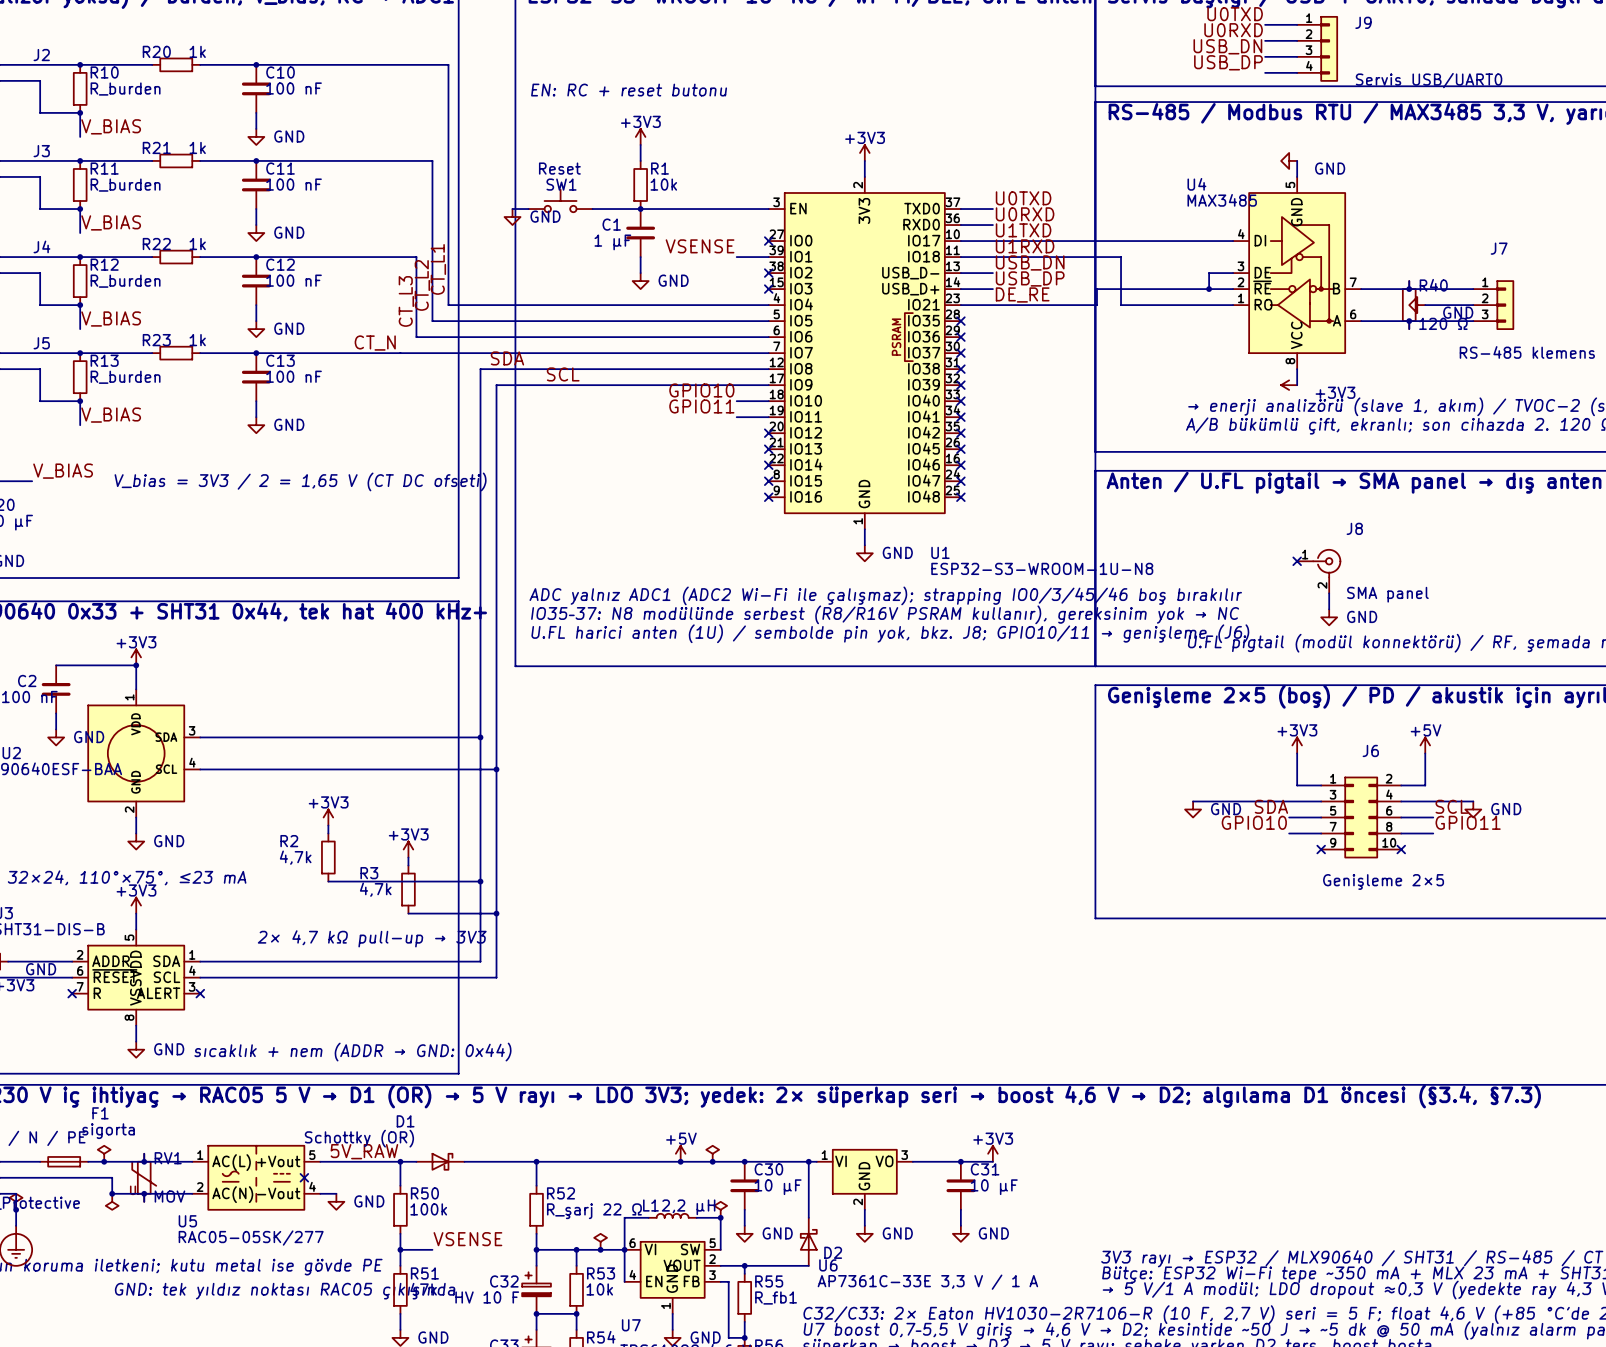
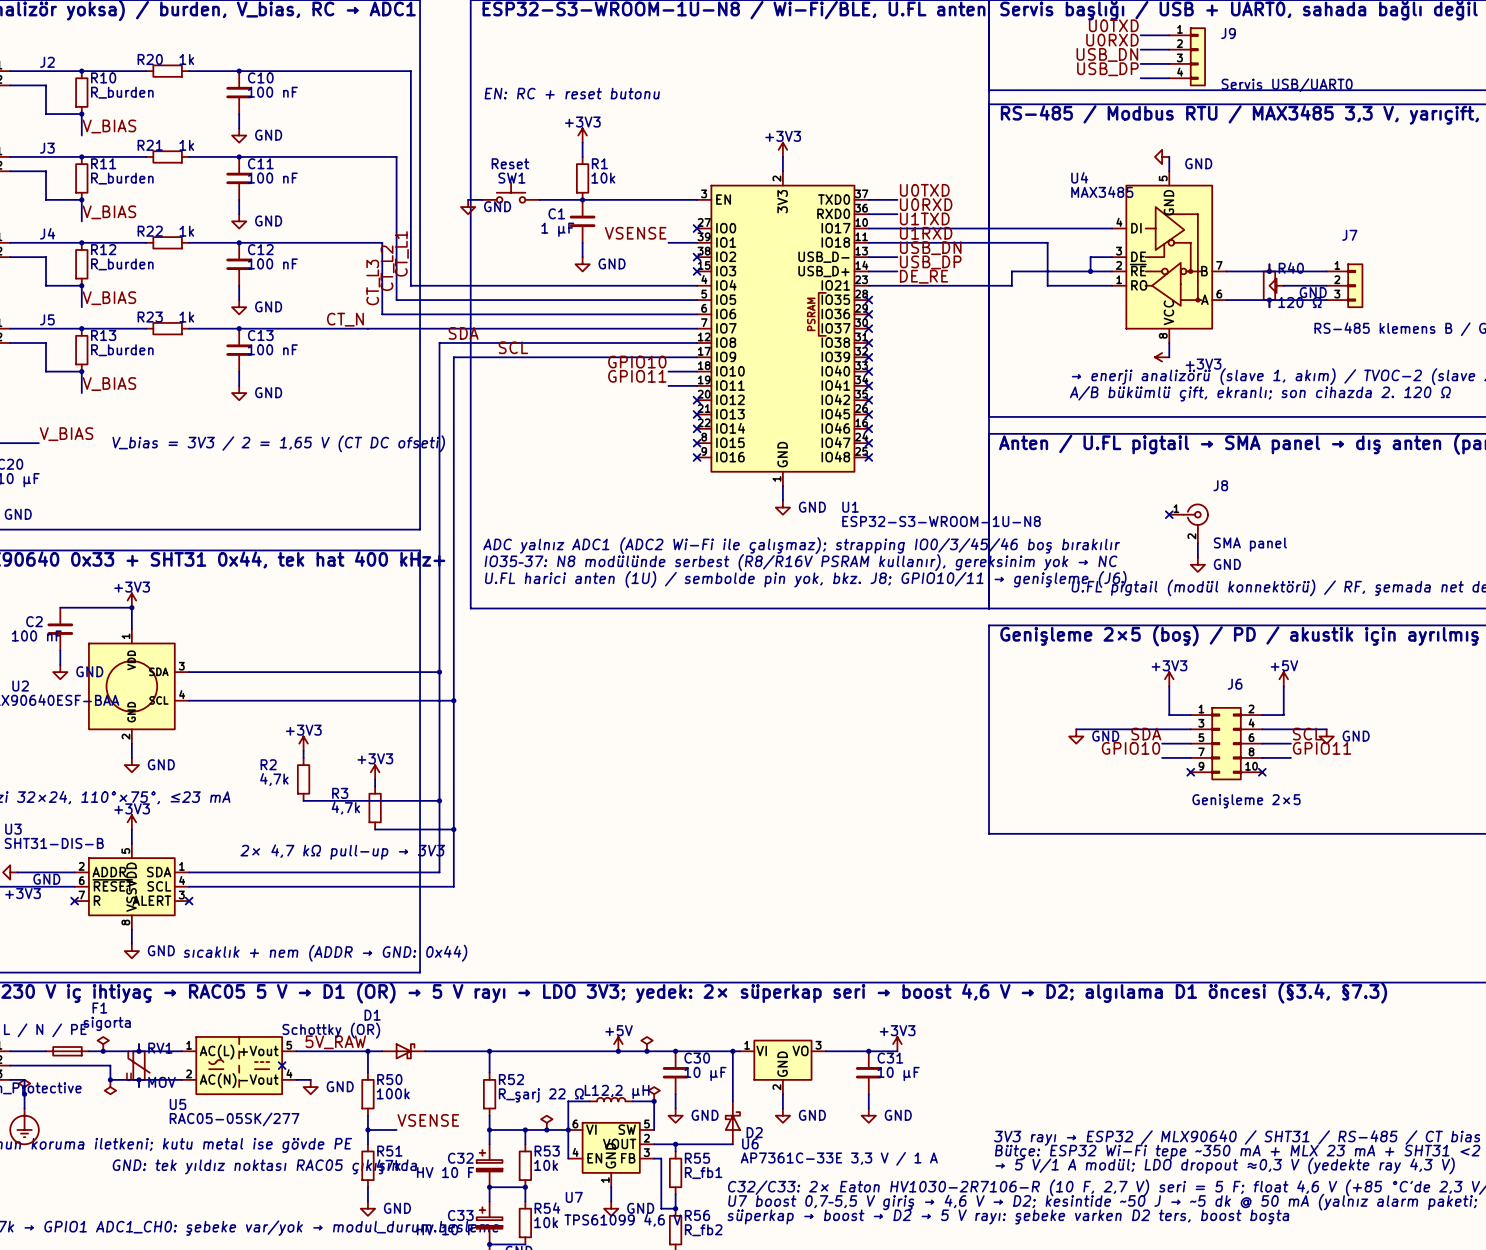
wire: (1121, 257) (1121, 289) (1097, 289) (1097, 305) -> (1011, 285) (990, 285)
wire: (1121, 305) (1161, 305) -> (1011, 242) (1047, 242) (1047, 285)

